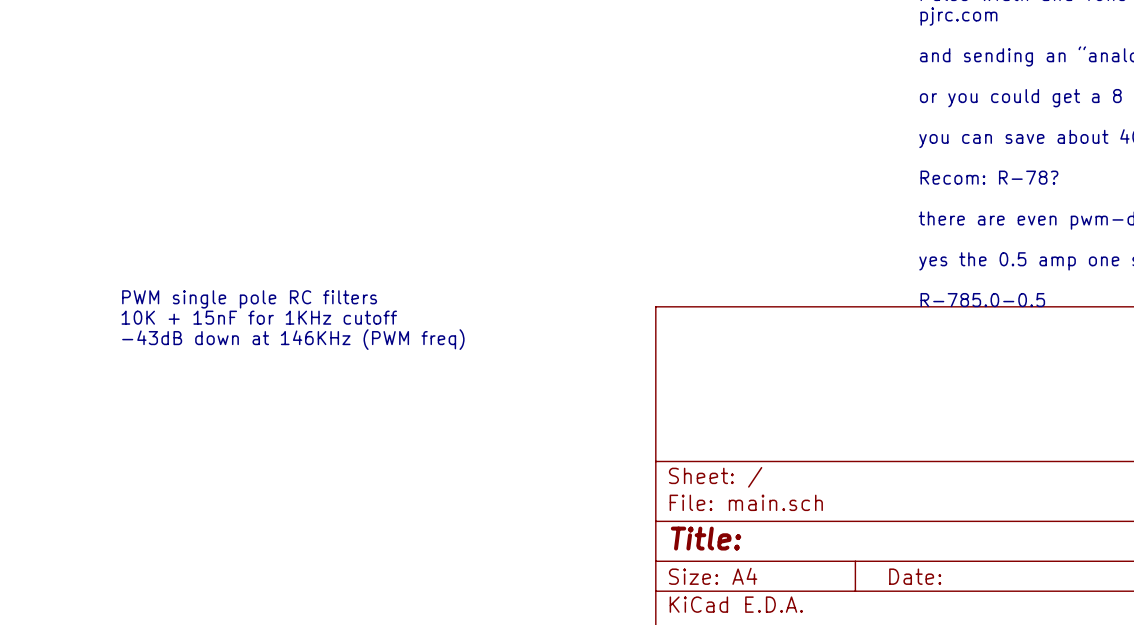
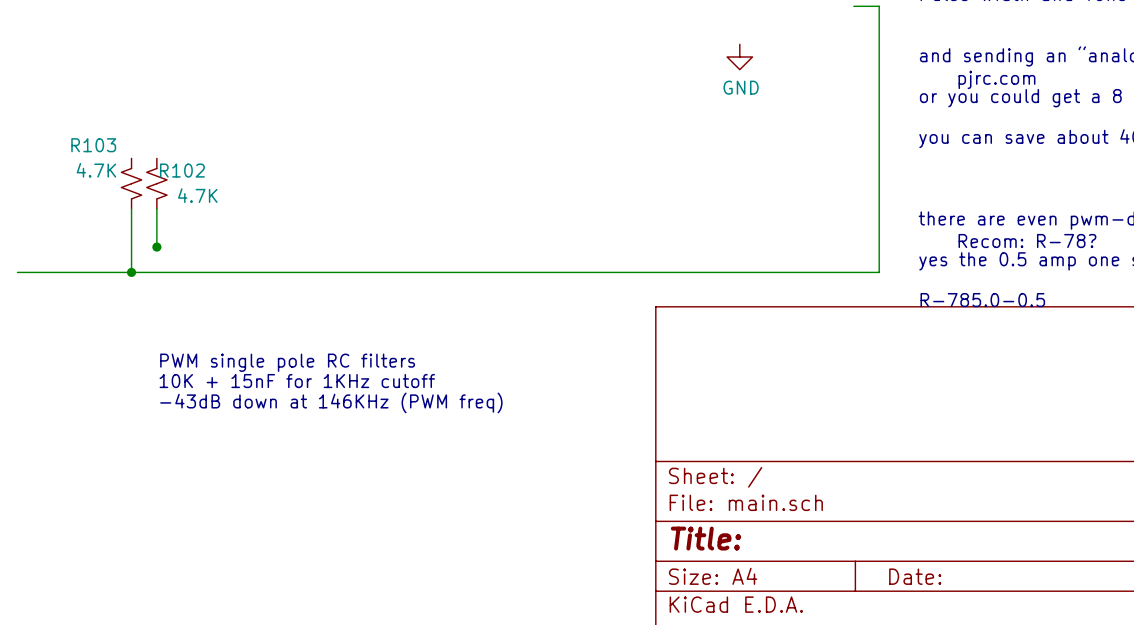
wire: none -> (853, 6) (879, 6) (879, 272) (17, 272)
text position: pjrc.com (958, 16) -> pjrc.com (996, 79)
power symbol: none -> GND (739, 56)
text position: Recom: R-78? (989, 177) -> Recom: R-78? (1027, 241)
R103: none -> 4.7K (131, 183)
R102: none -> 4.7K (156, 183)
wire: none -> (131, 209) (131, 272)
wire: none -> (156, 209) (156, 247)
junction: none -> (156, 247)
junction: none -> (131, 272)
text position: PWM single pole RC filters (249, 299) -> PWM single pole RC filters (287, 362)
text position: 10K + 15nF for 1KHz cutoff (259, 317) -> 10K + 15nF for 1KHz cutoff (297, 381)
text position: -43dB down at 146KHz (PWM freq) (293, 339) -> -43dB down at 146KHz (PWM freq) (331, 402)

